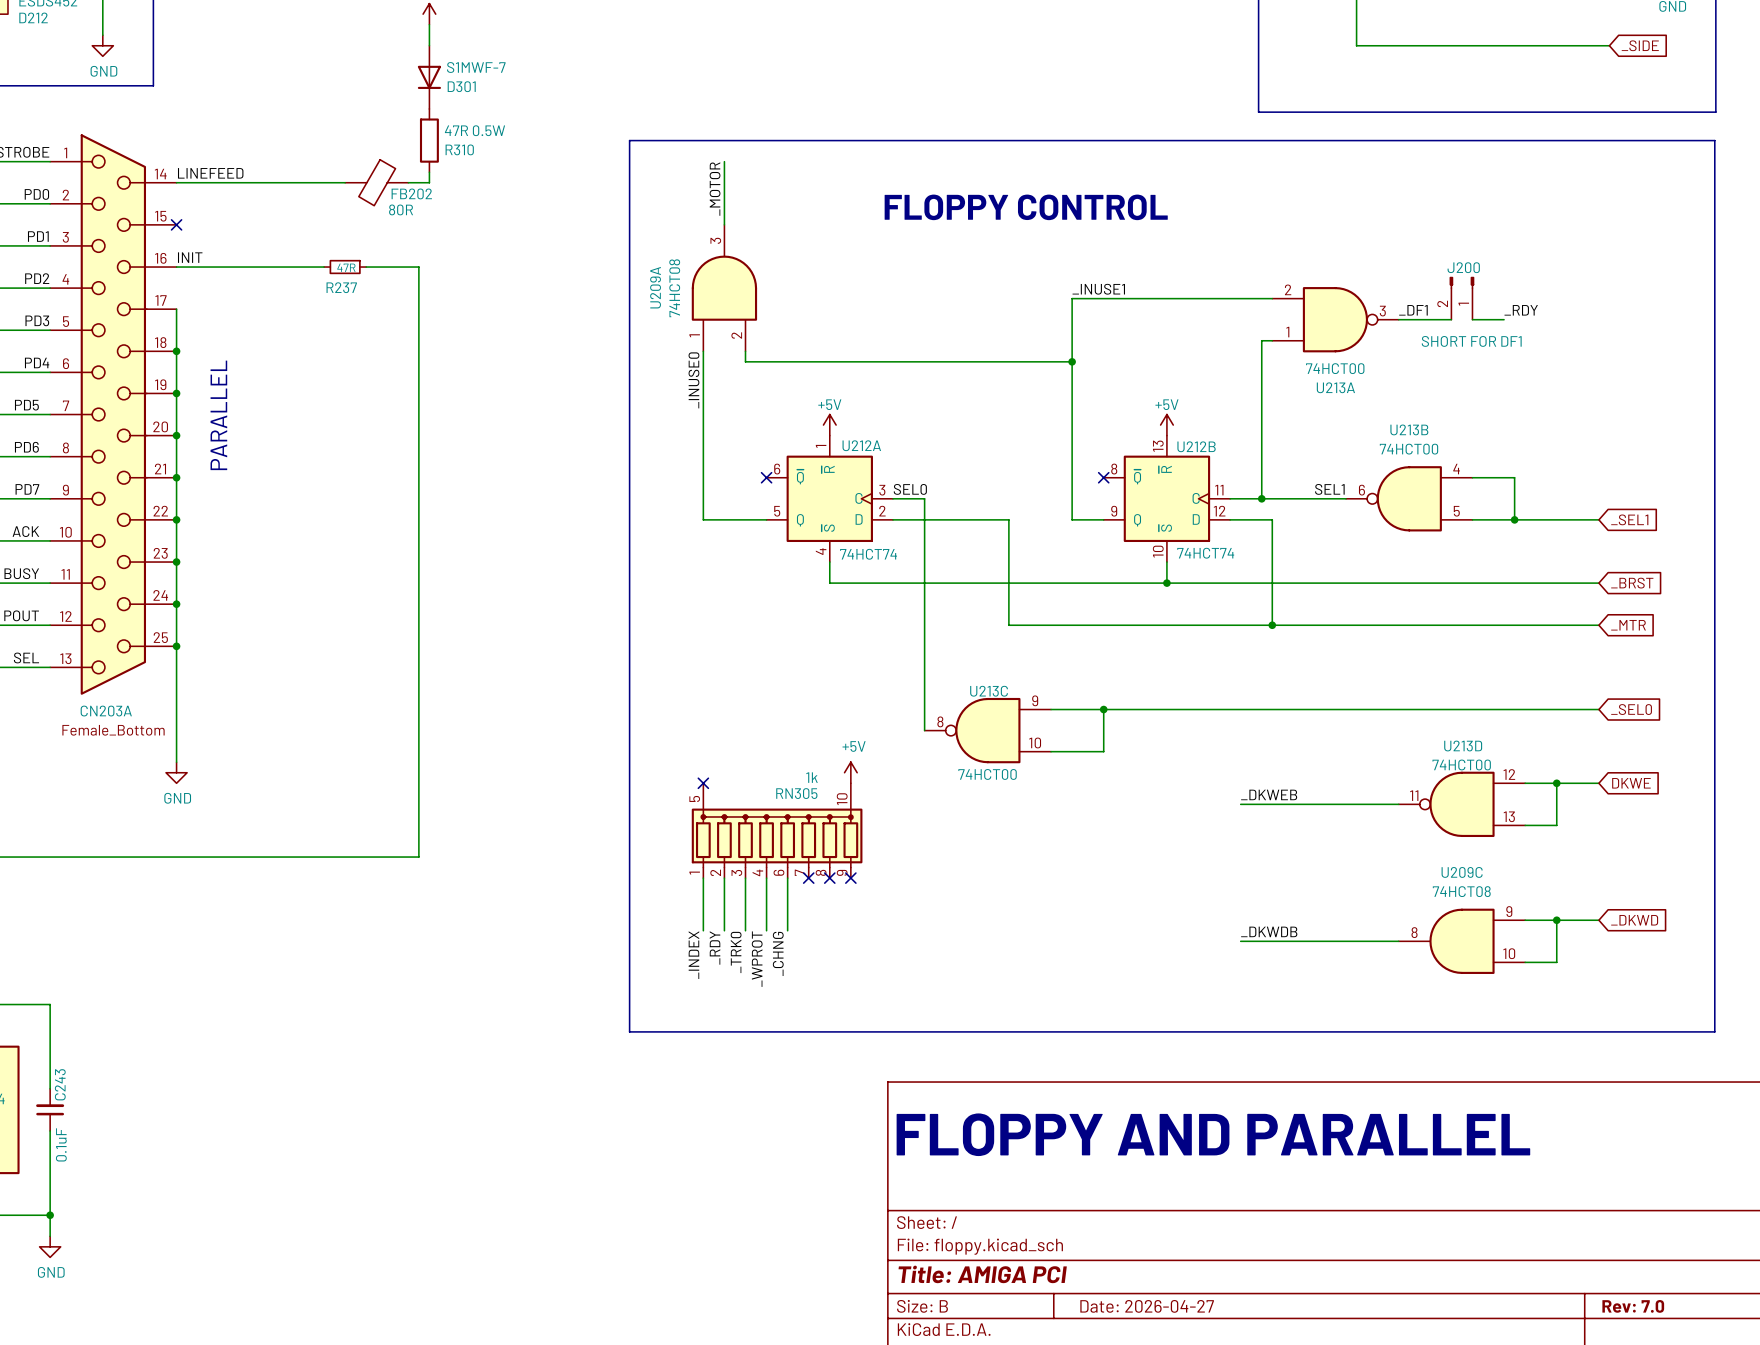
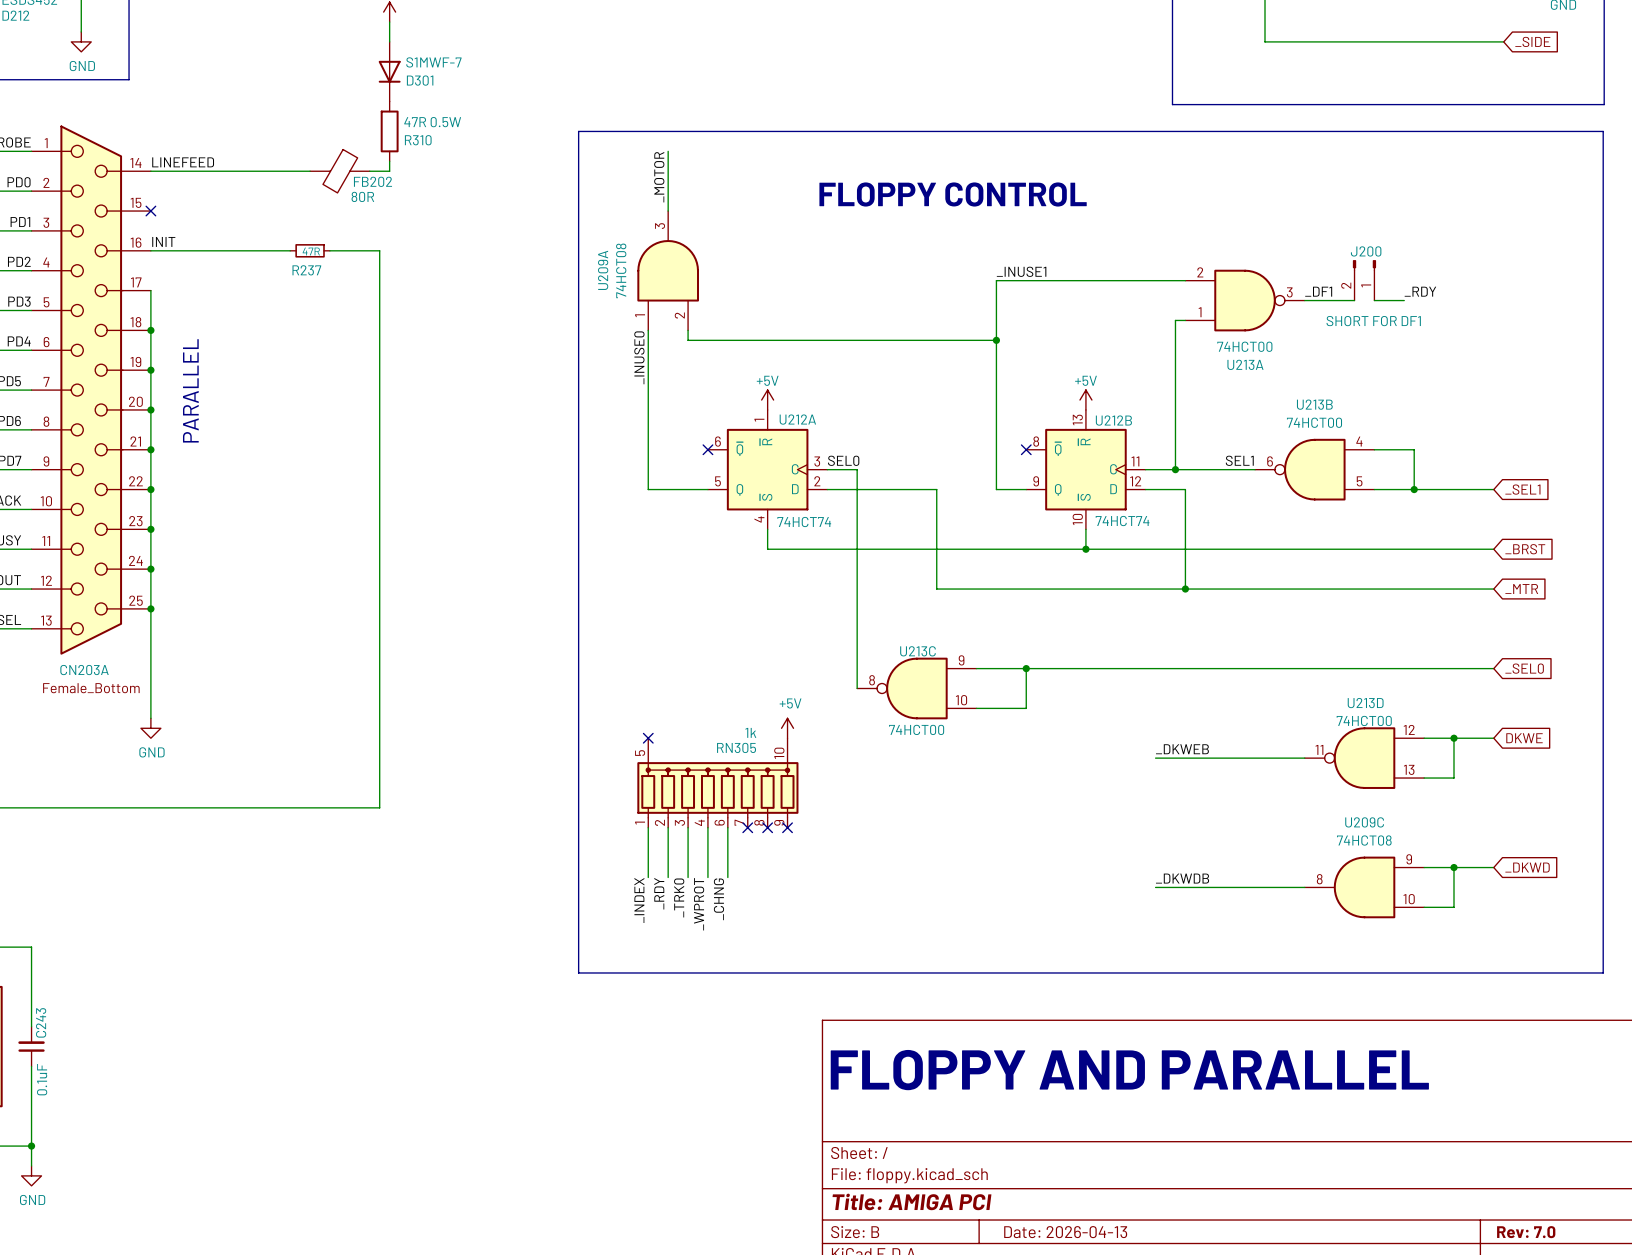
title block: Date: 2026-04-27 (1147, 1306) -> Date: 2026-04-13 (1065, 1232)

